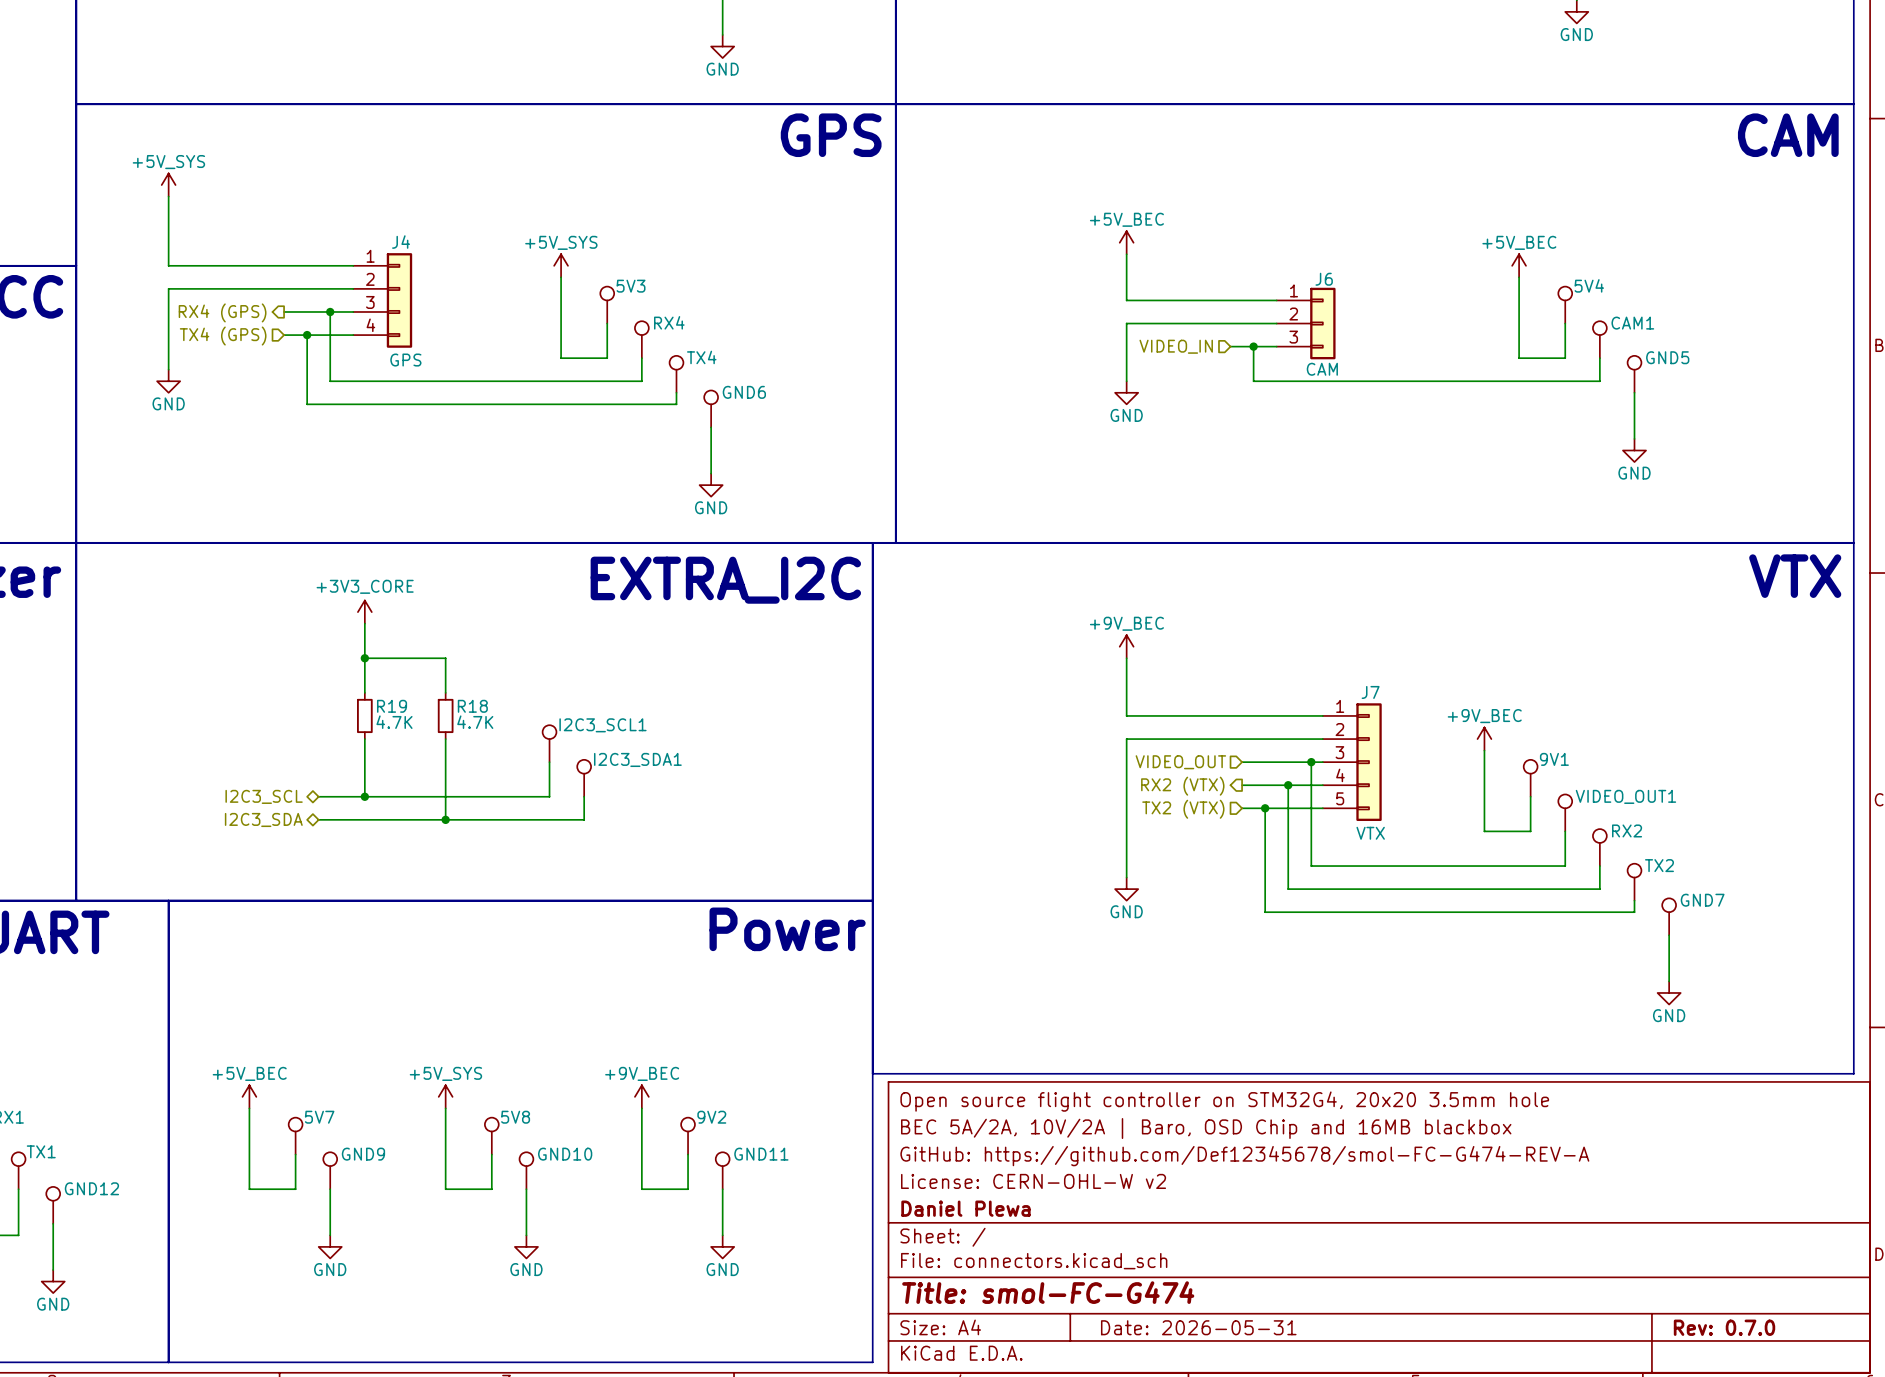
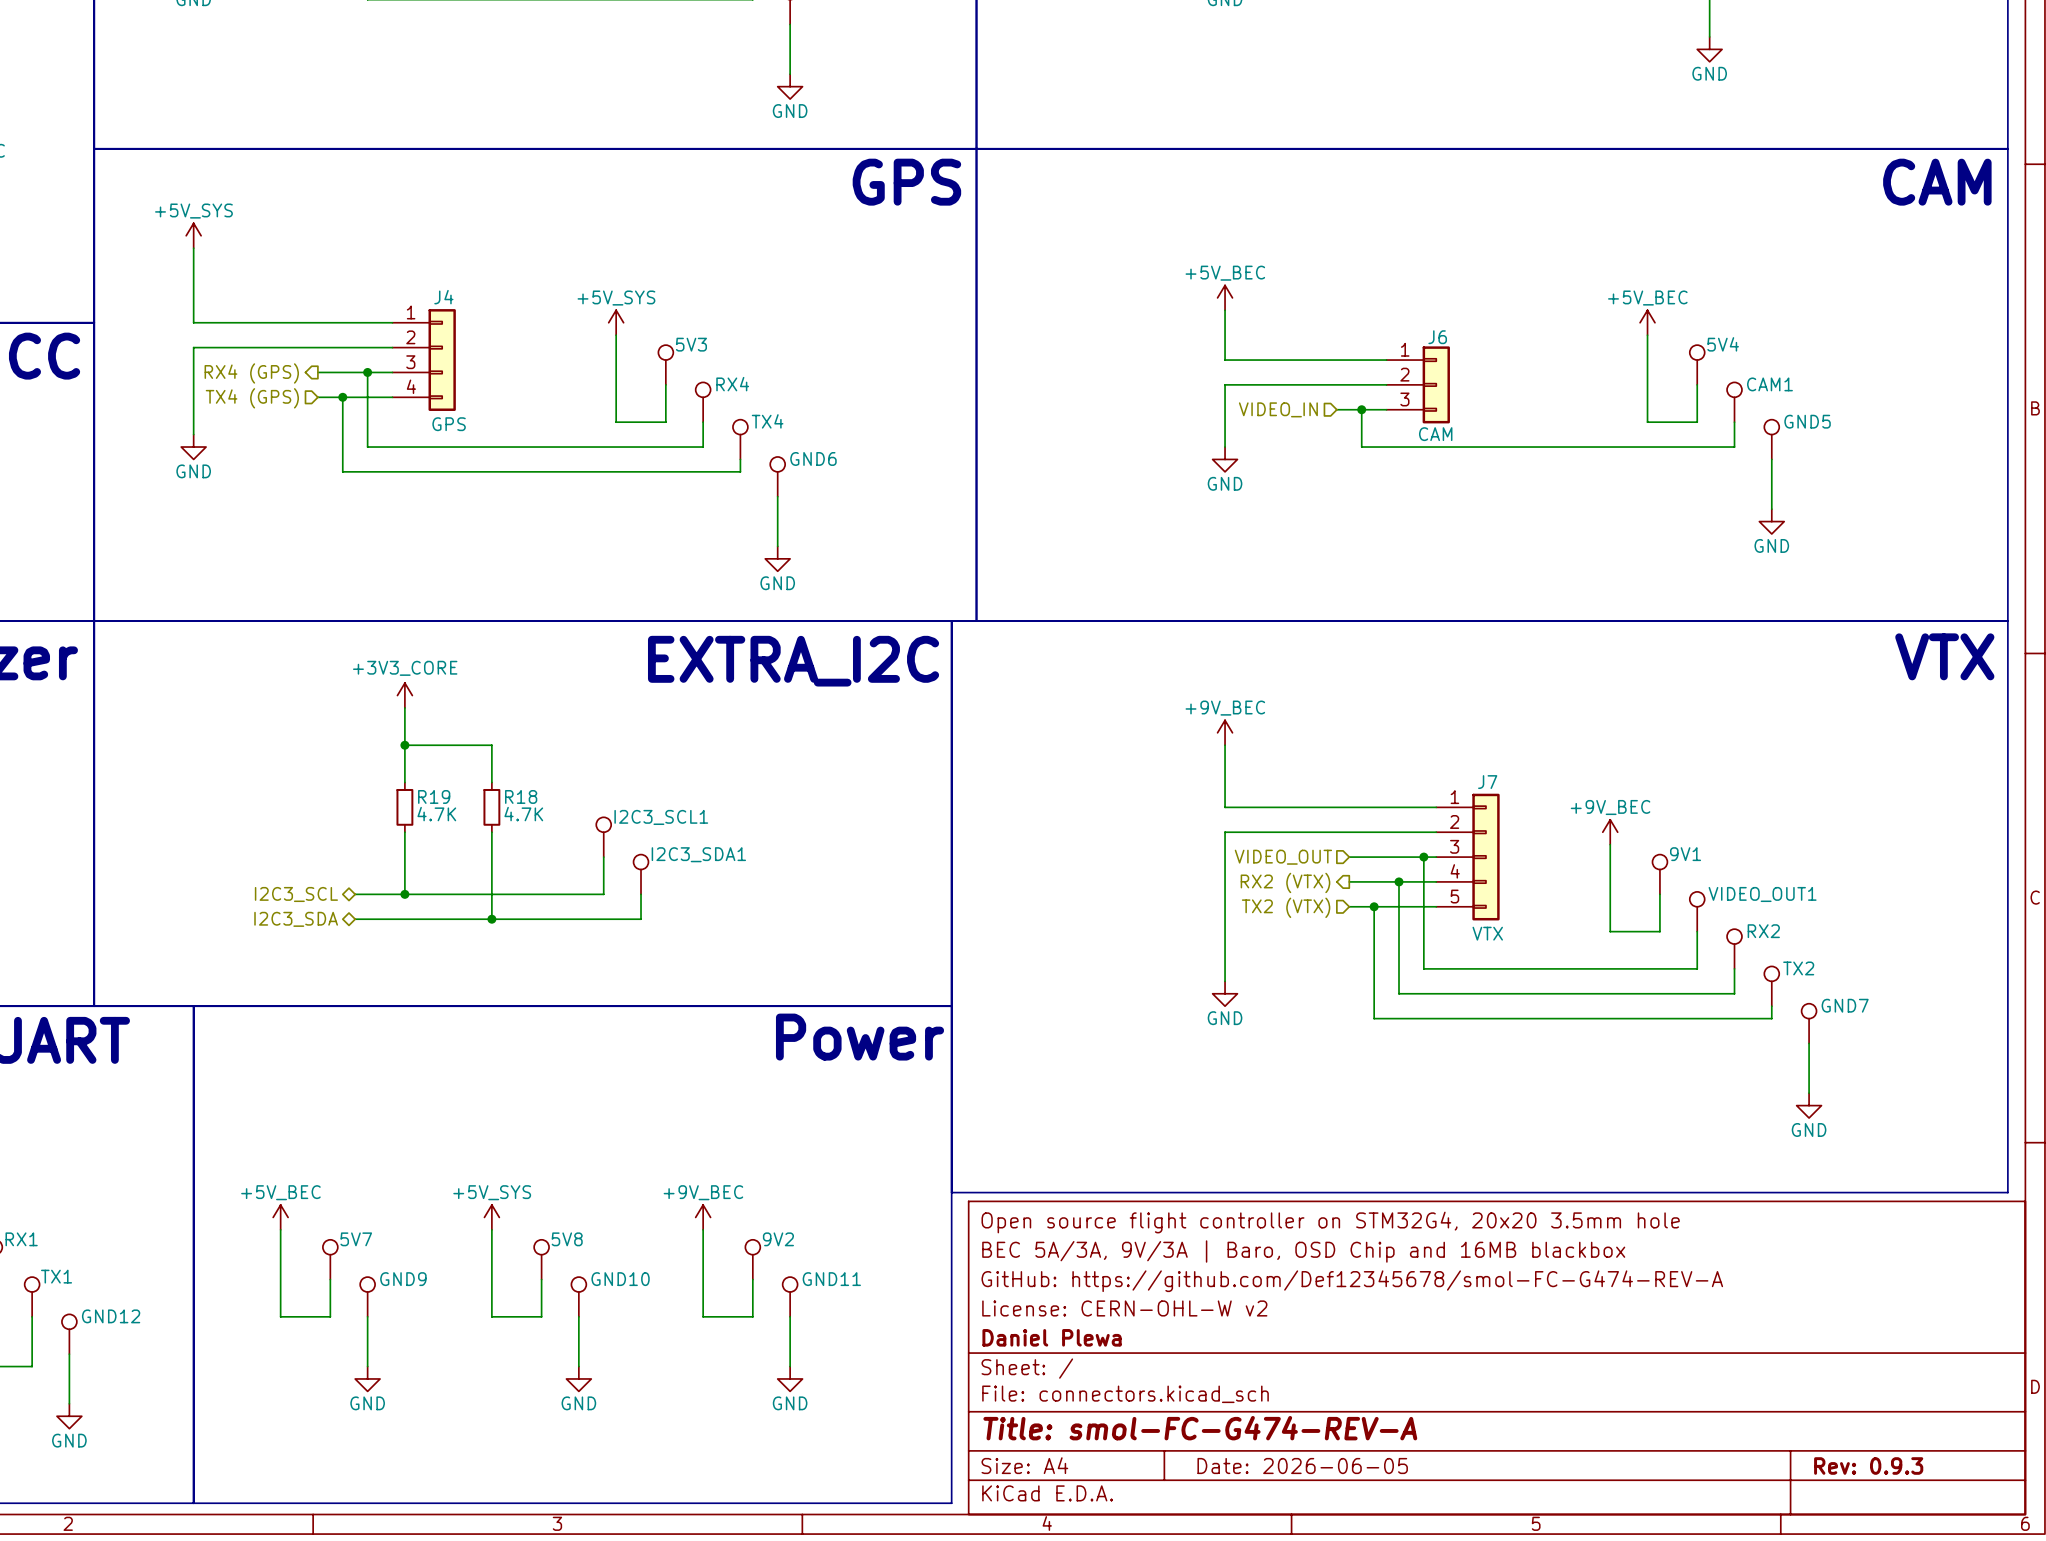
title block: BEC 5A/2A, 10V/2A | Baro, OSD Chip and 16MB blackbox (1206, 1128) -> BEC 5A/3A, 9V/3A | Baro, OSD Chip and 16MB blackbox (1303, 1251)
title block: Title: smol-FC-G474 (1048, 1292) -> Title: smol-FC-G474-REV-A (1200, 1428)
title block: Date: 2026-05-31 (1198, 1327) -> Date: 2026-06-05 (1302, 1466)
title block: Rev: 0.7.0 (1724, 1327) -> Rev: 0.9.3 (1868, 1466)

